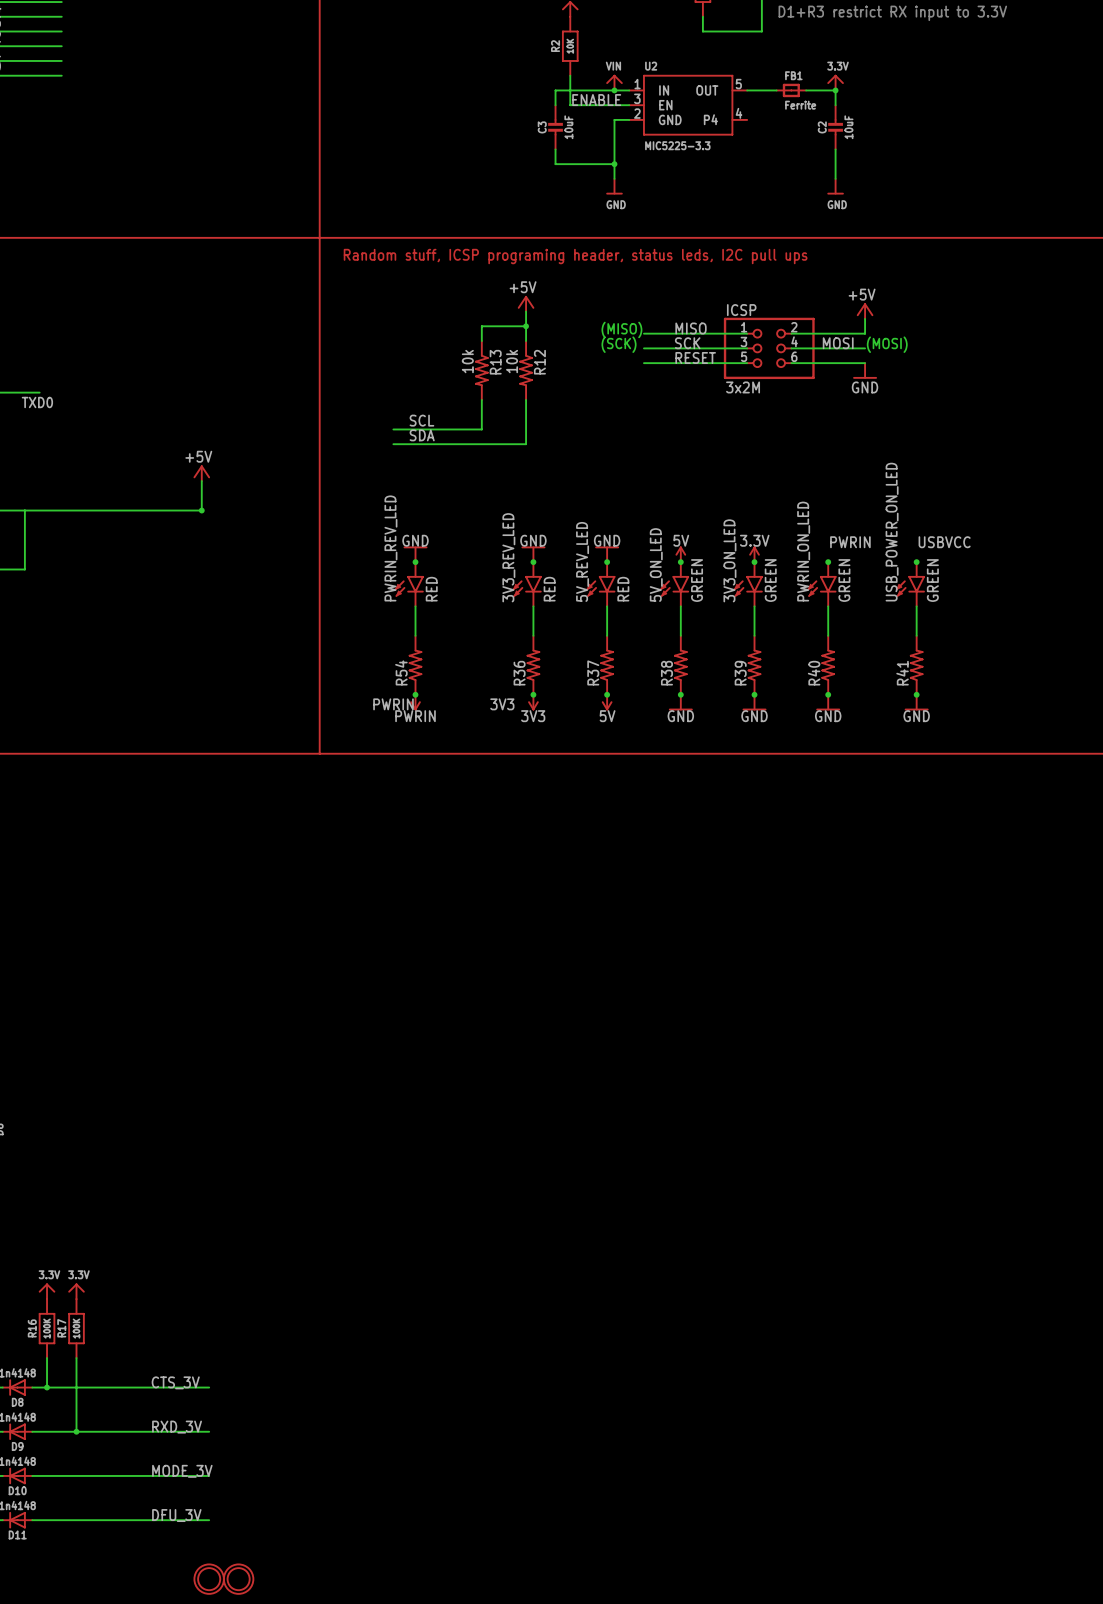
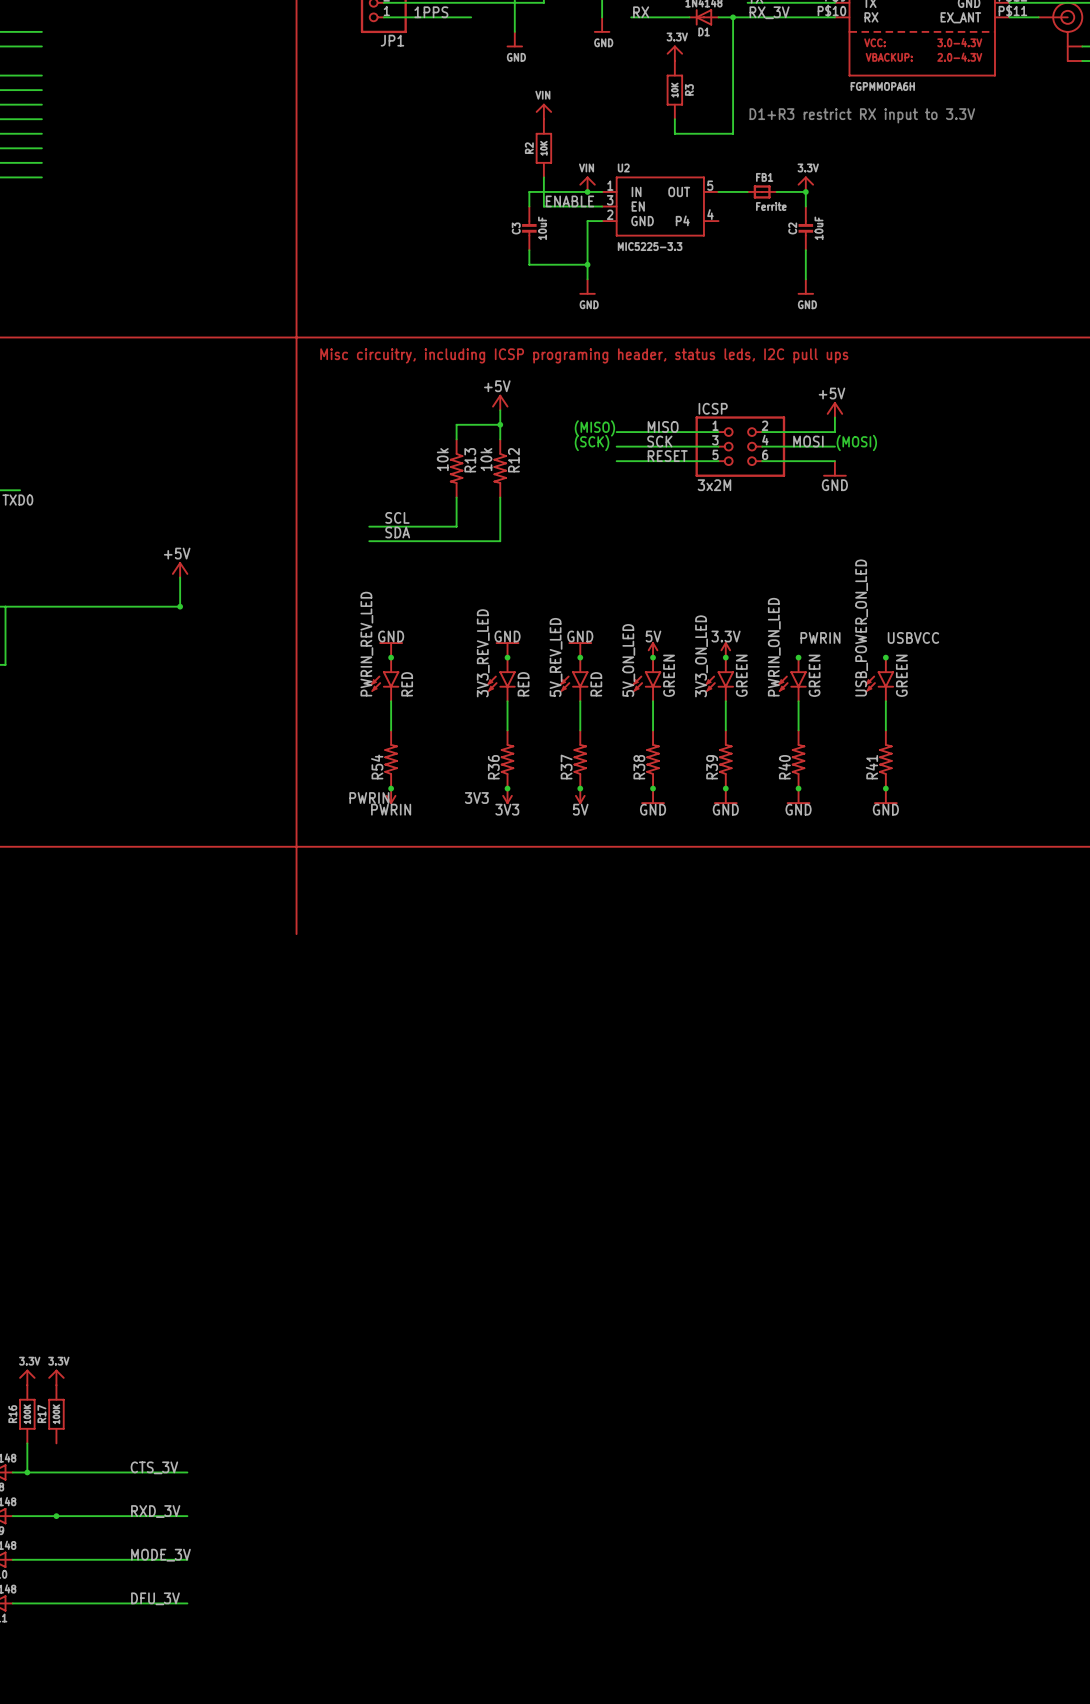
text: Random stuff, ICSP programing header, status leds, I2C pull ups (575, 256) -> Misc circuitry, including ICSP programing header, status leds, I2C pull ups (584, 355)
line: none -> (296, 846) (296, 934)
wire: (76, 1358) (76, 1431) -> none
part: (209, 1579) -> none
part: (238, 1579) -> none

